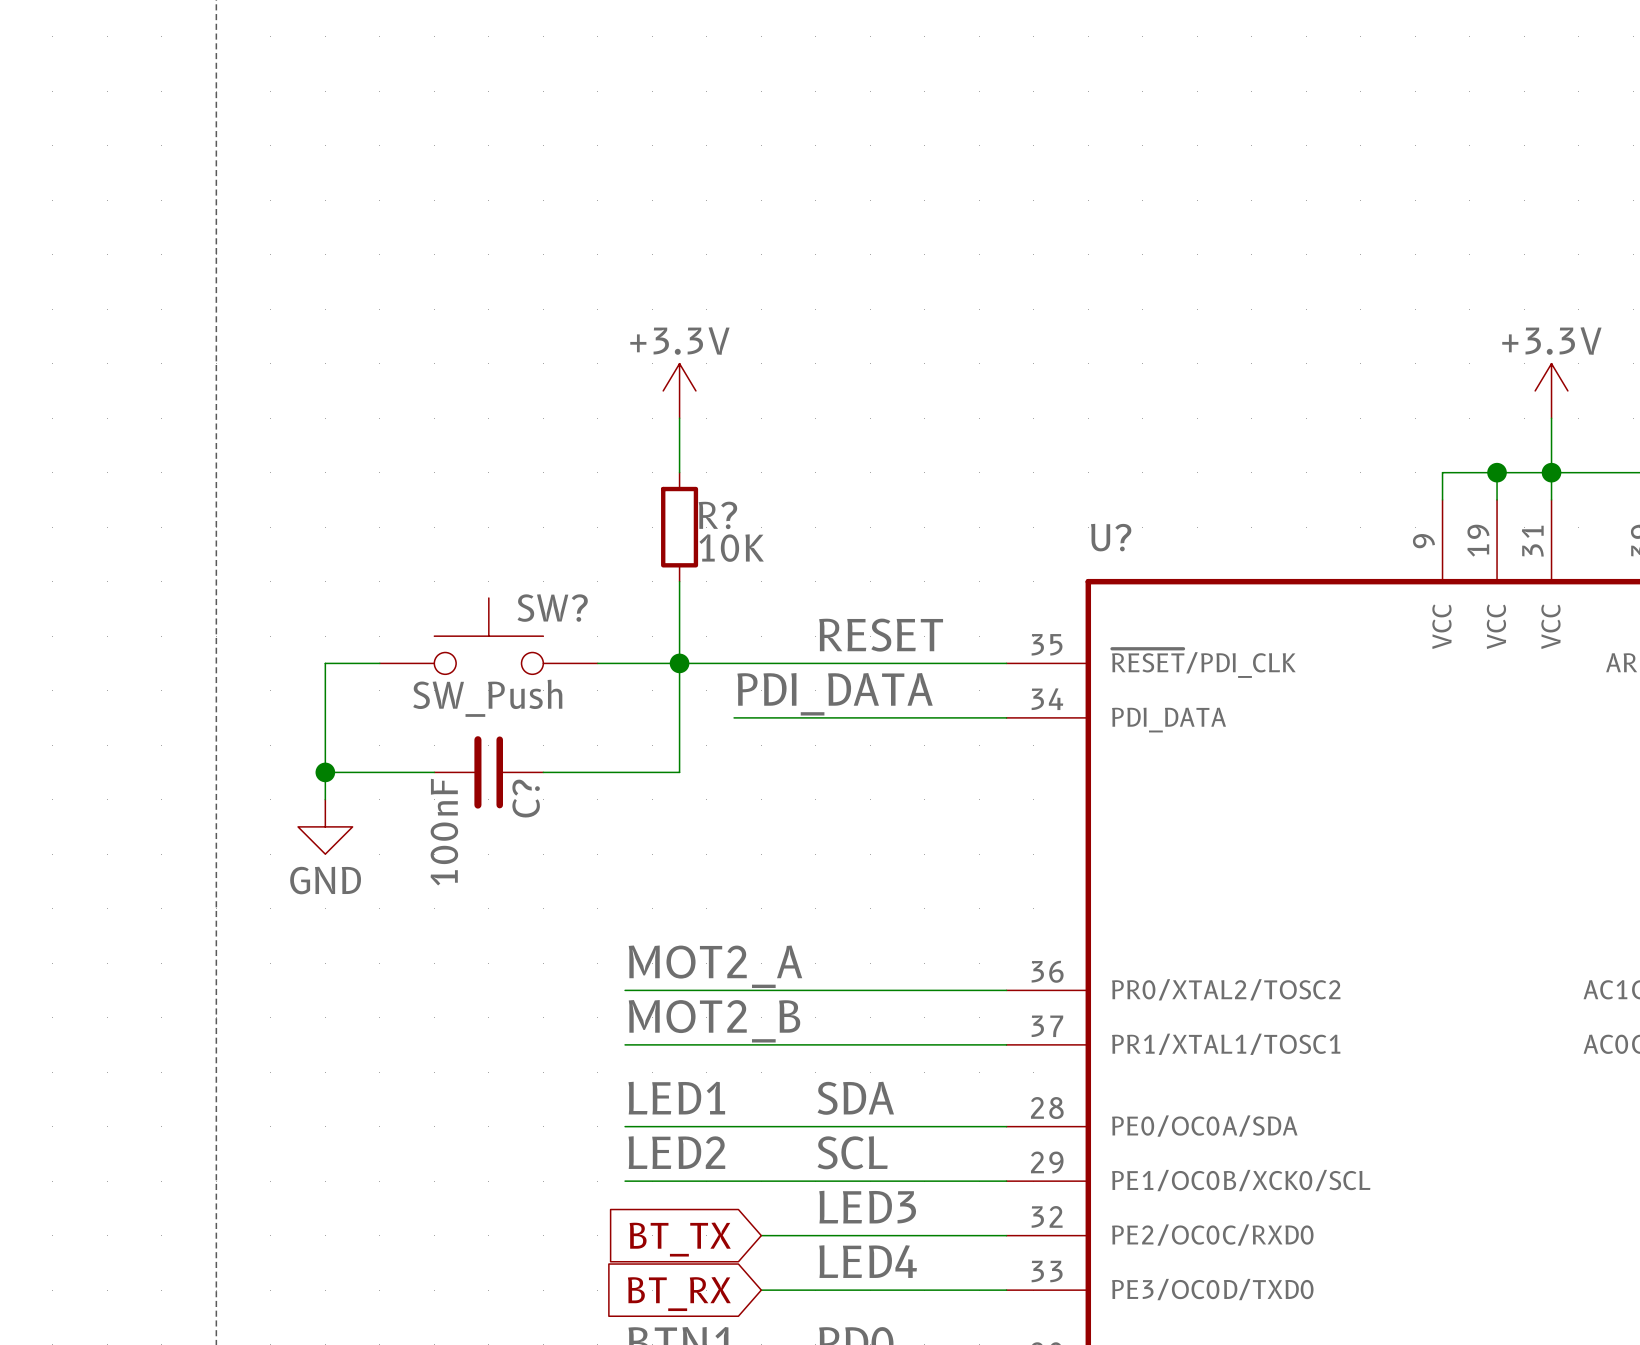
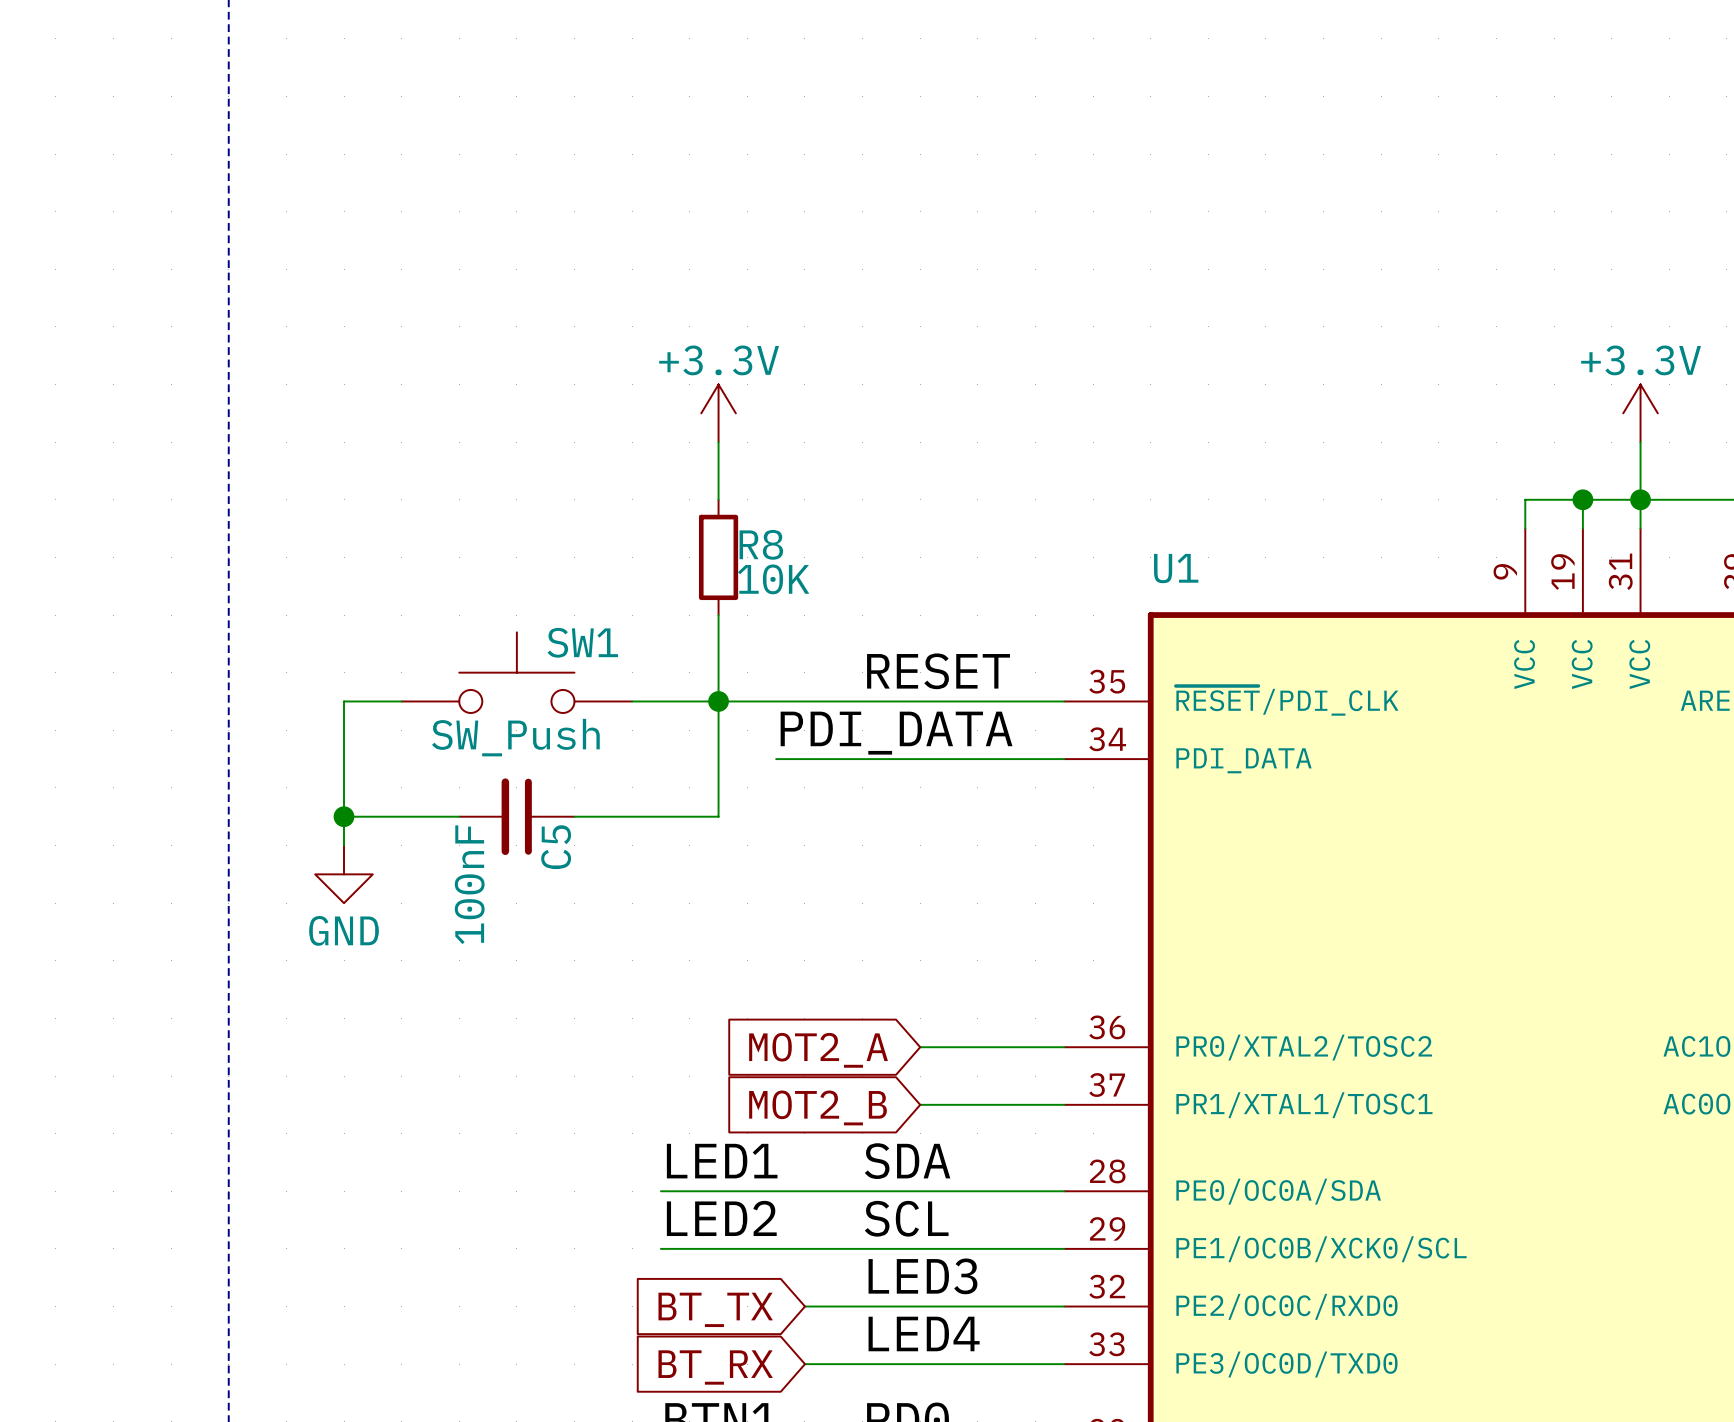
R? name: R? (717, 515) -> R8 (761, 544)
U? name: U? (1111, 537) -> U1 (1176, 568)
SW? name: SW? (552, 608) -> SW1 (582, 642)
C? name: C? (526, 798) -> C5 (556, 847)
label: MOT2_A (715, 966) -> none
wire: (625, 990) (870, 990) -> none
global label: none -> MOT2_A (818, 1050)
label: MOT2_B (714, 1021) -> none
wire: (625, 1044) (870, 1044) -> none
global label: none -> MOT2_B (818, 1107)

